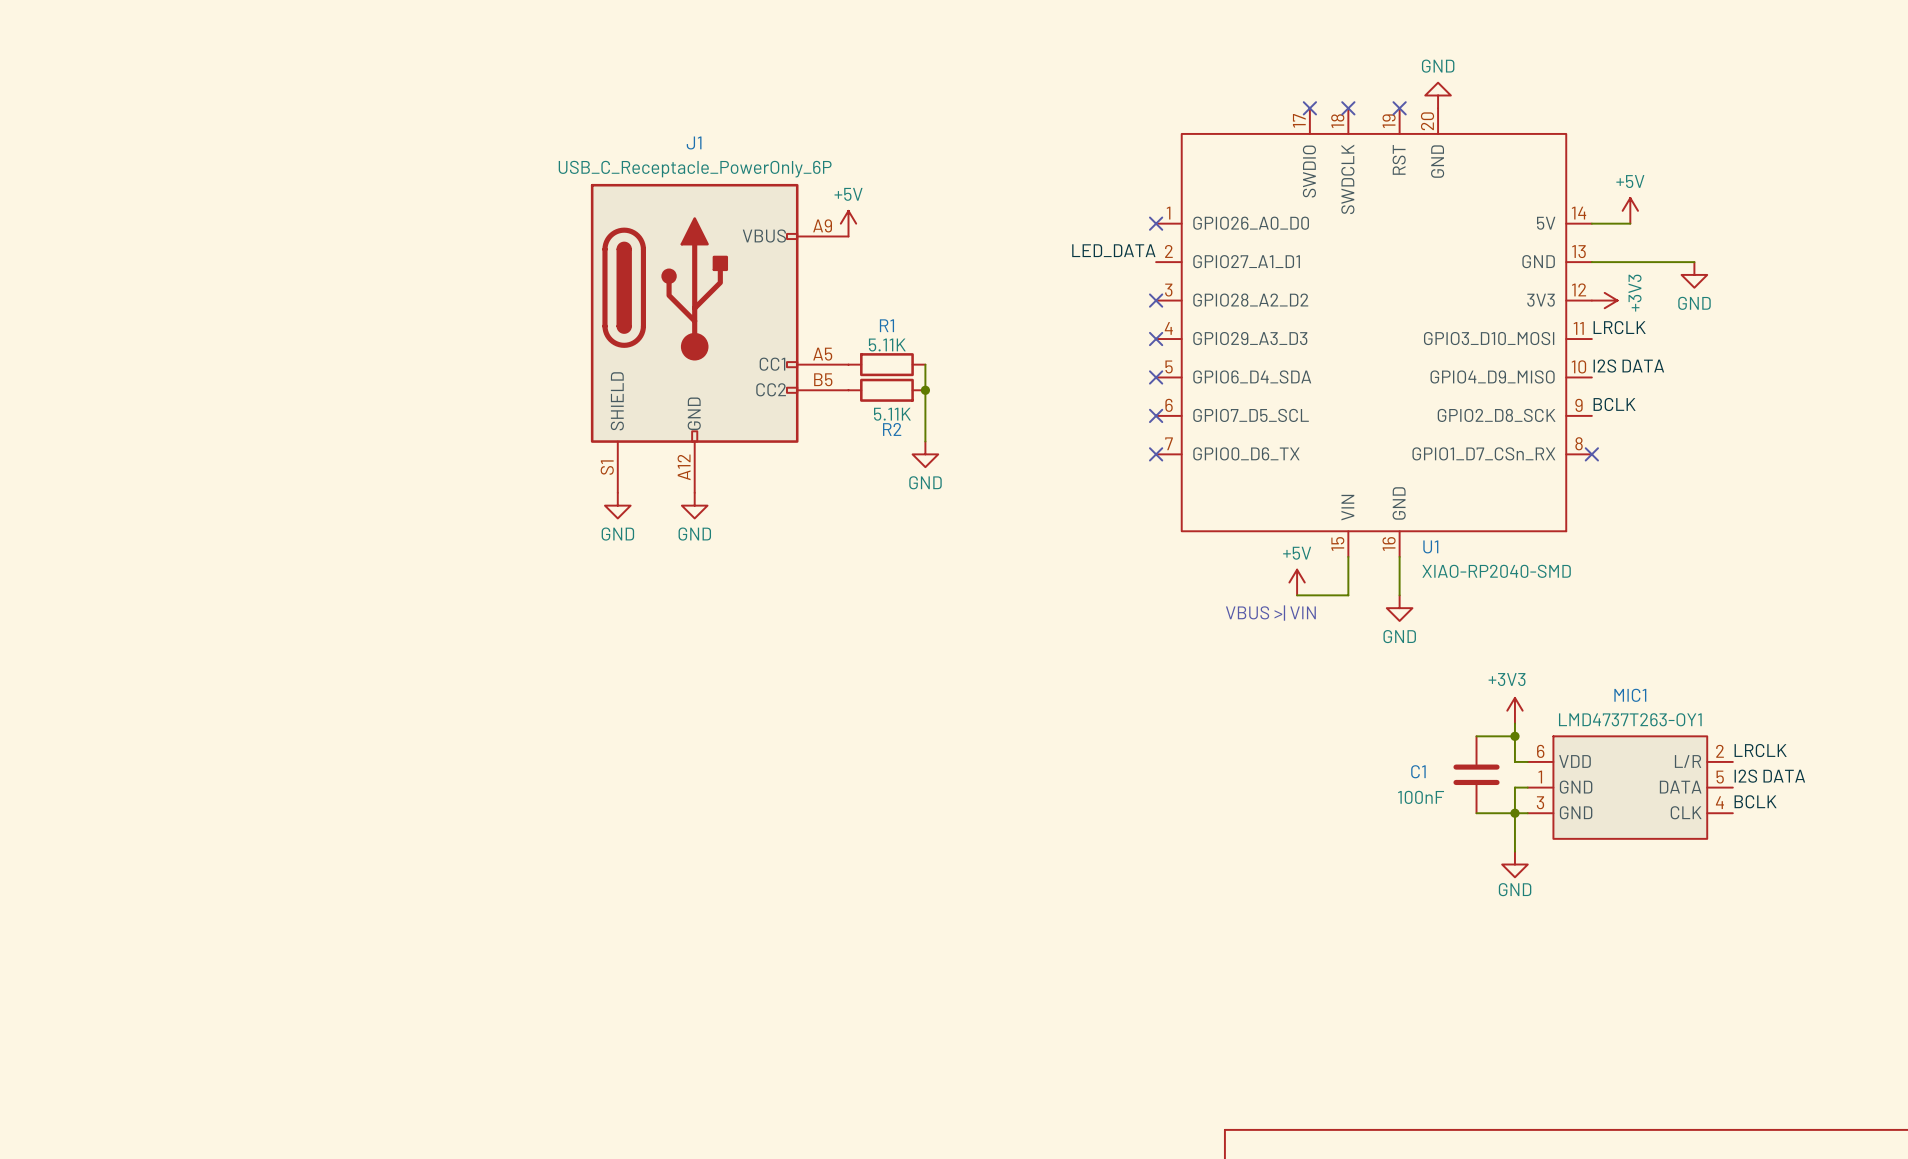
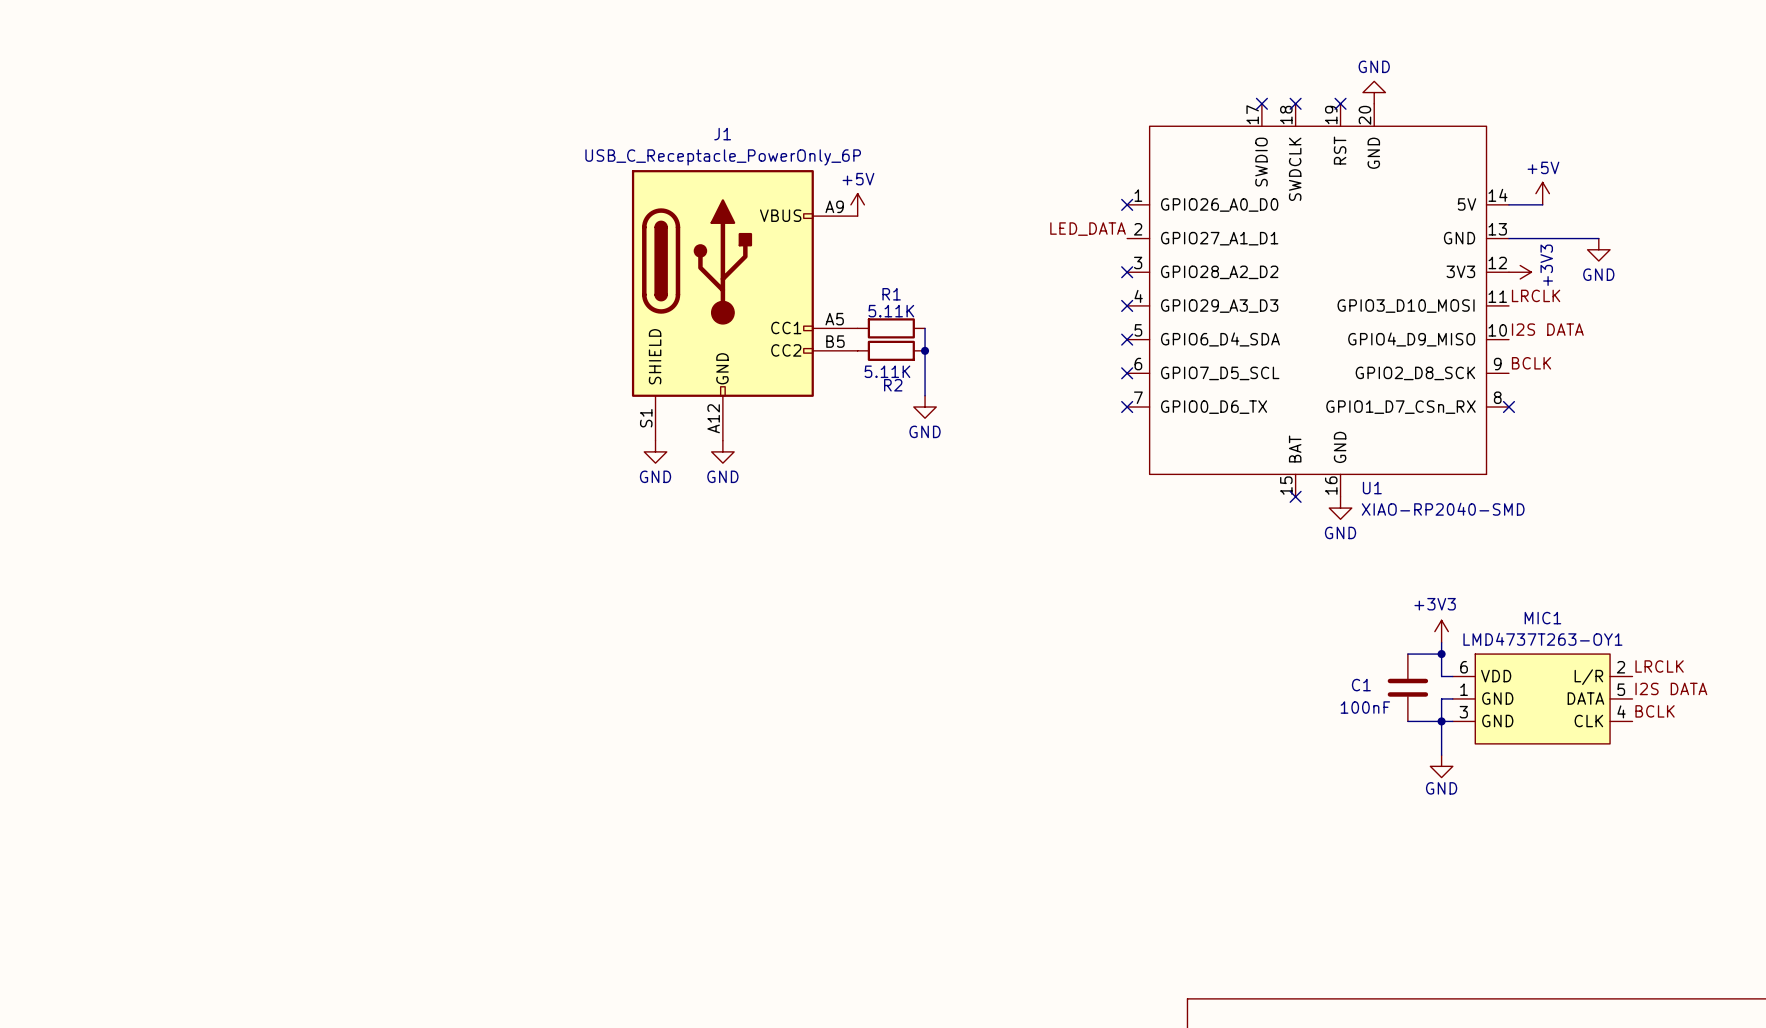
U1 pin name: VIN (1347, 507) -> BAT (1295, 449)
wire: (1348, 556) (1348, 595) (1297, 595) -> none
no-connect mark: none -> (1295, 496)
wire: (1399, 556) (1399, 595) -> none
power symbol: +5V (1297, 582) -> none
power symbol position: GND (1399, 608) -> GND (1340, 508)
text: VBUS >| VIN (1270, 613) -> none

